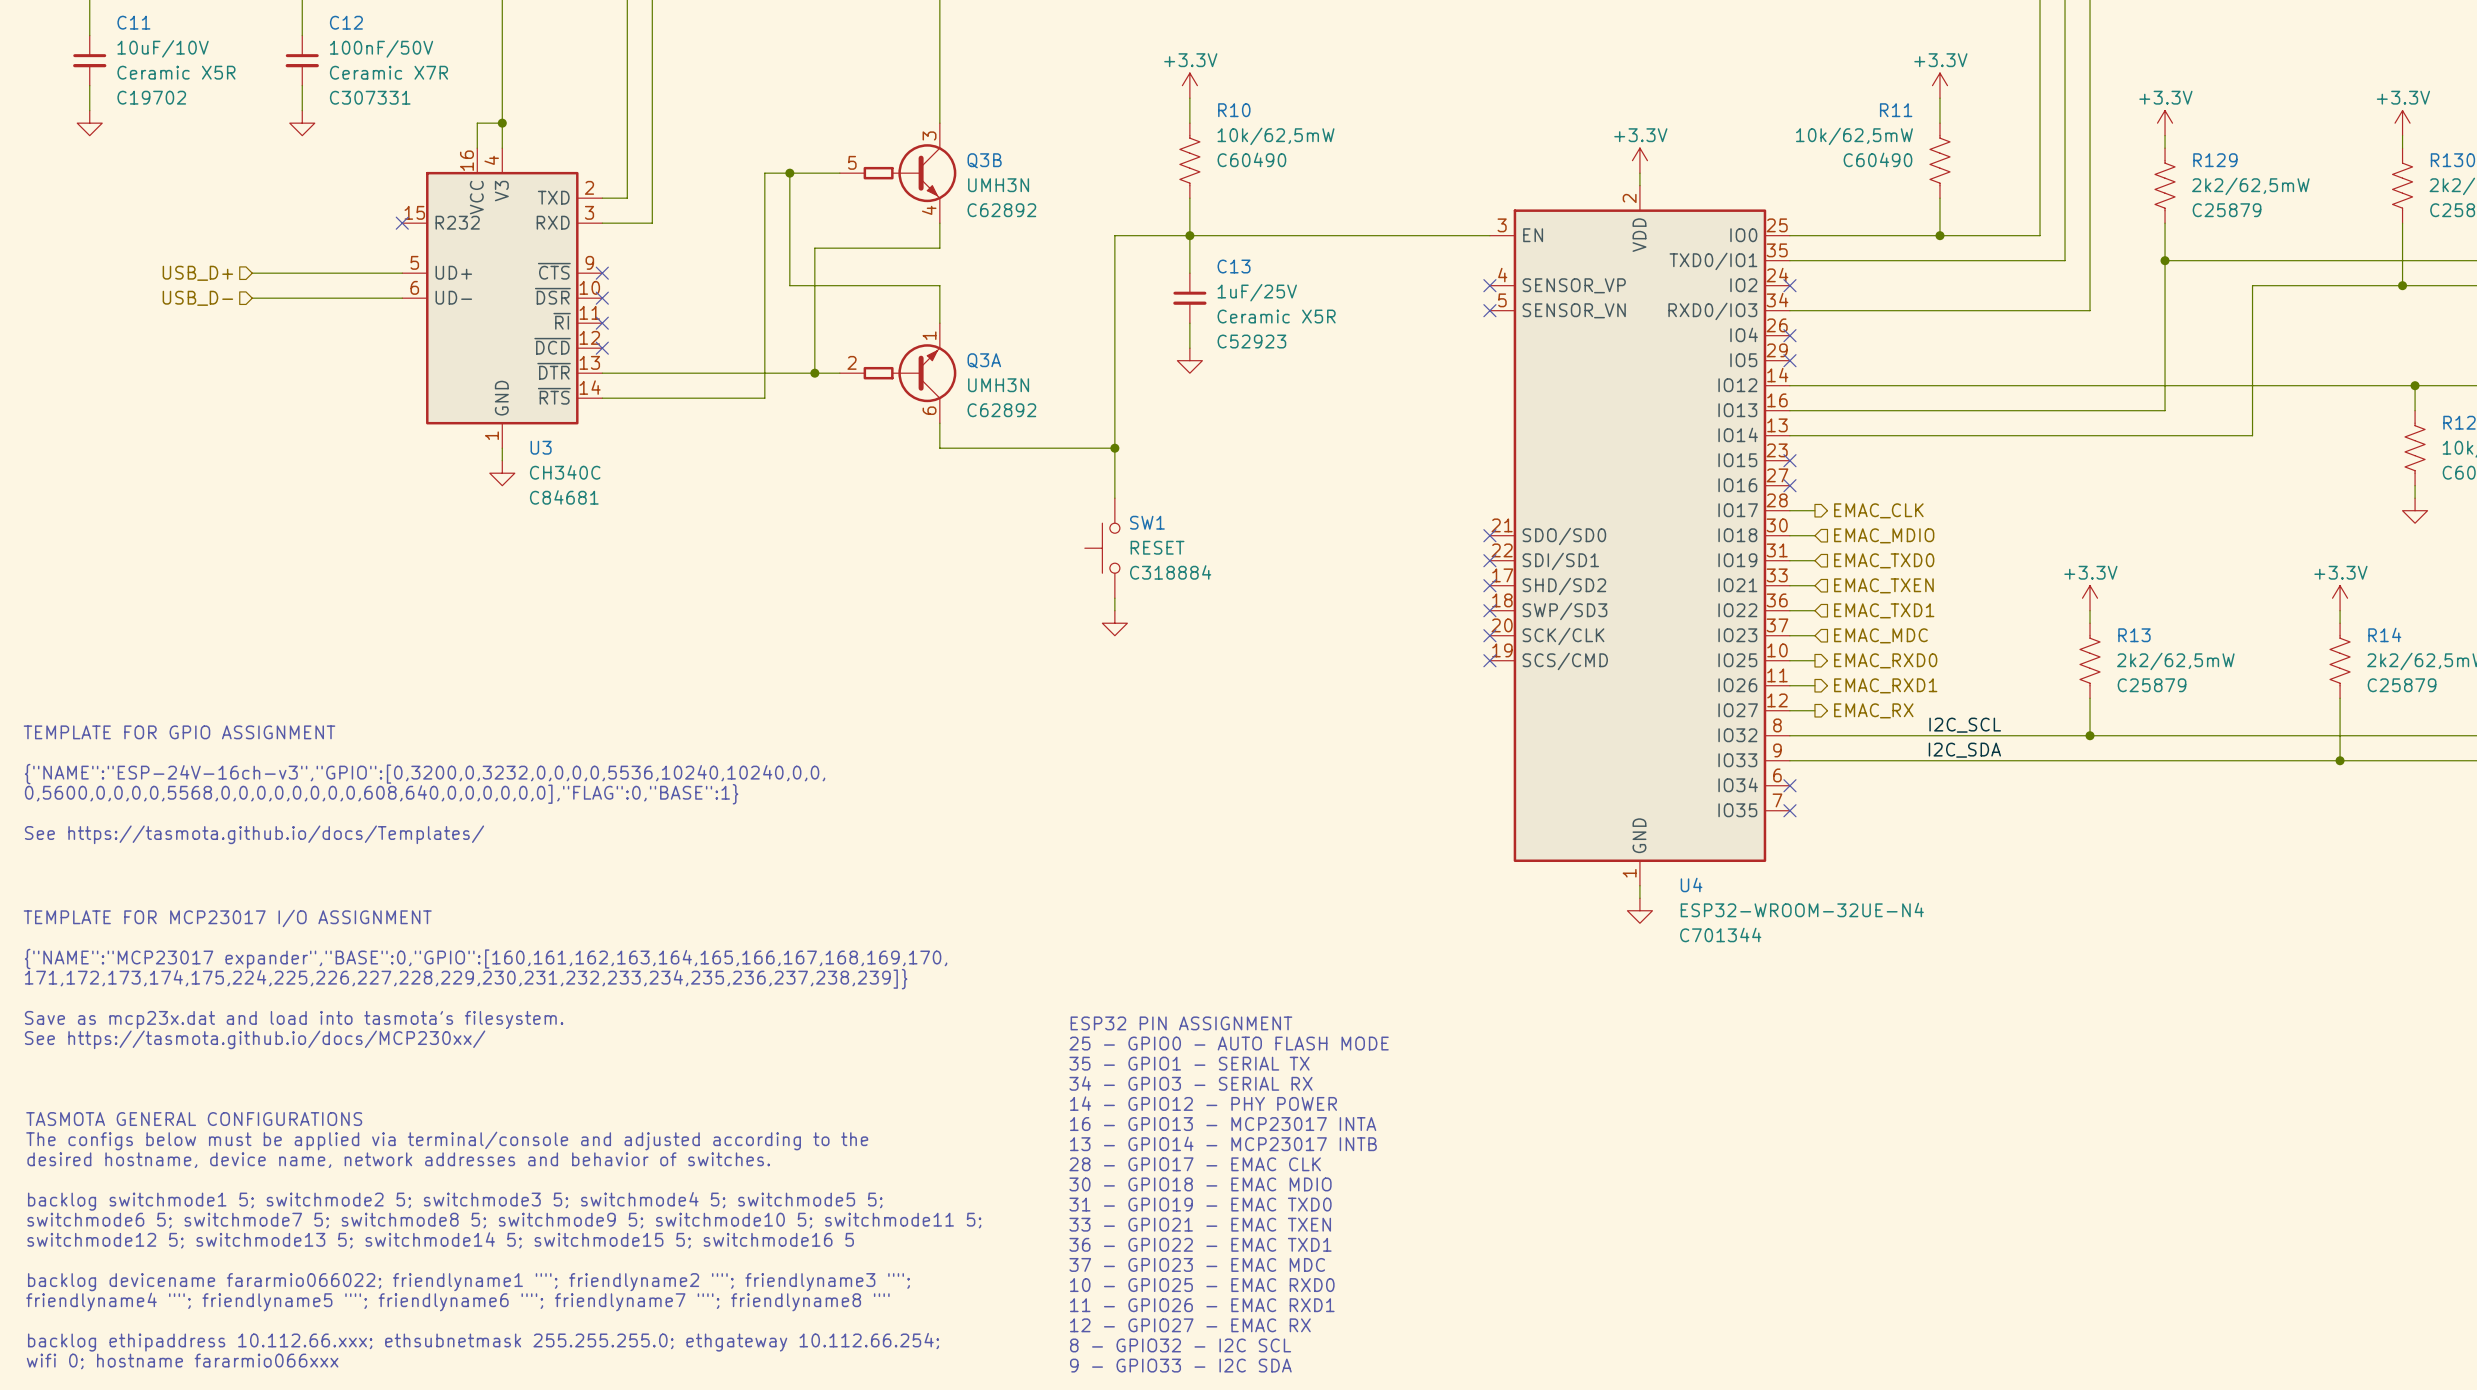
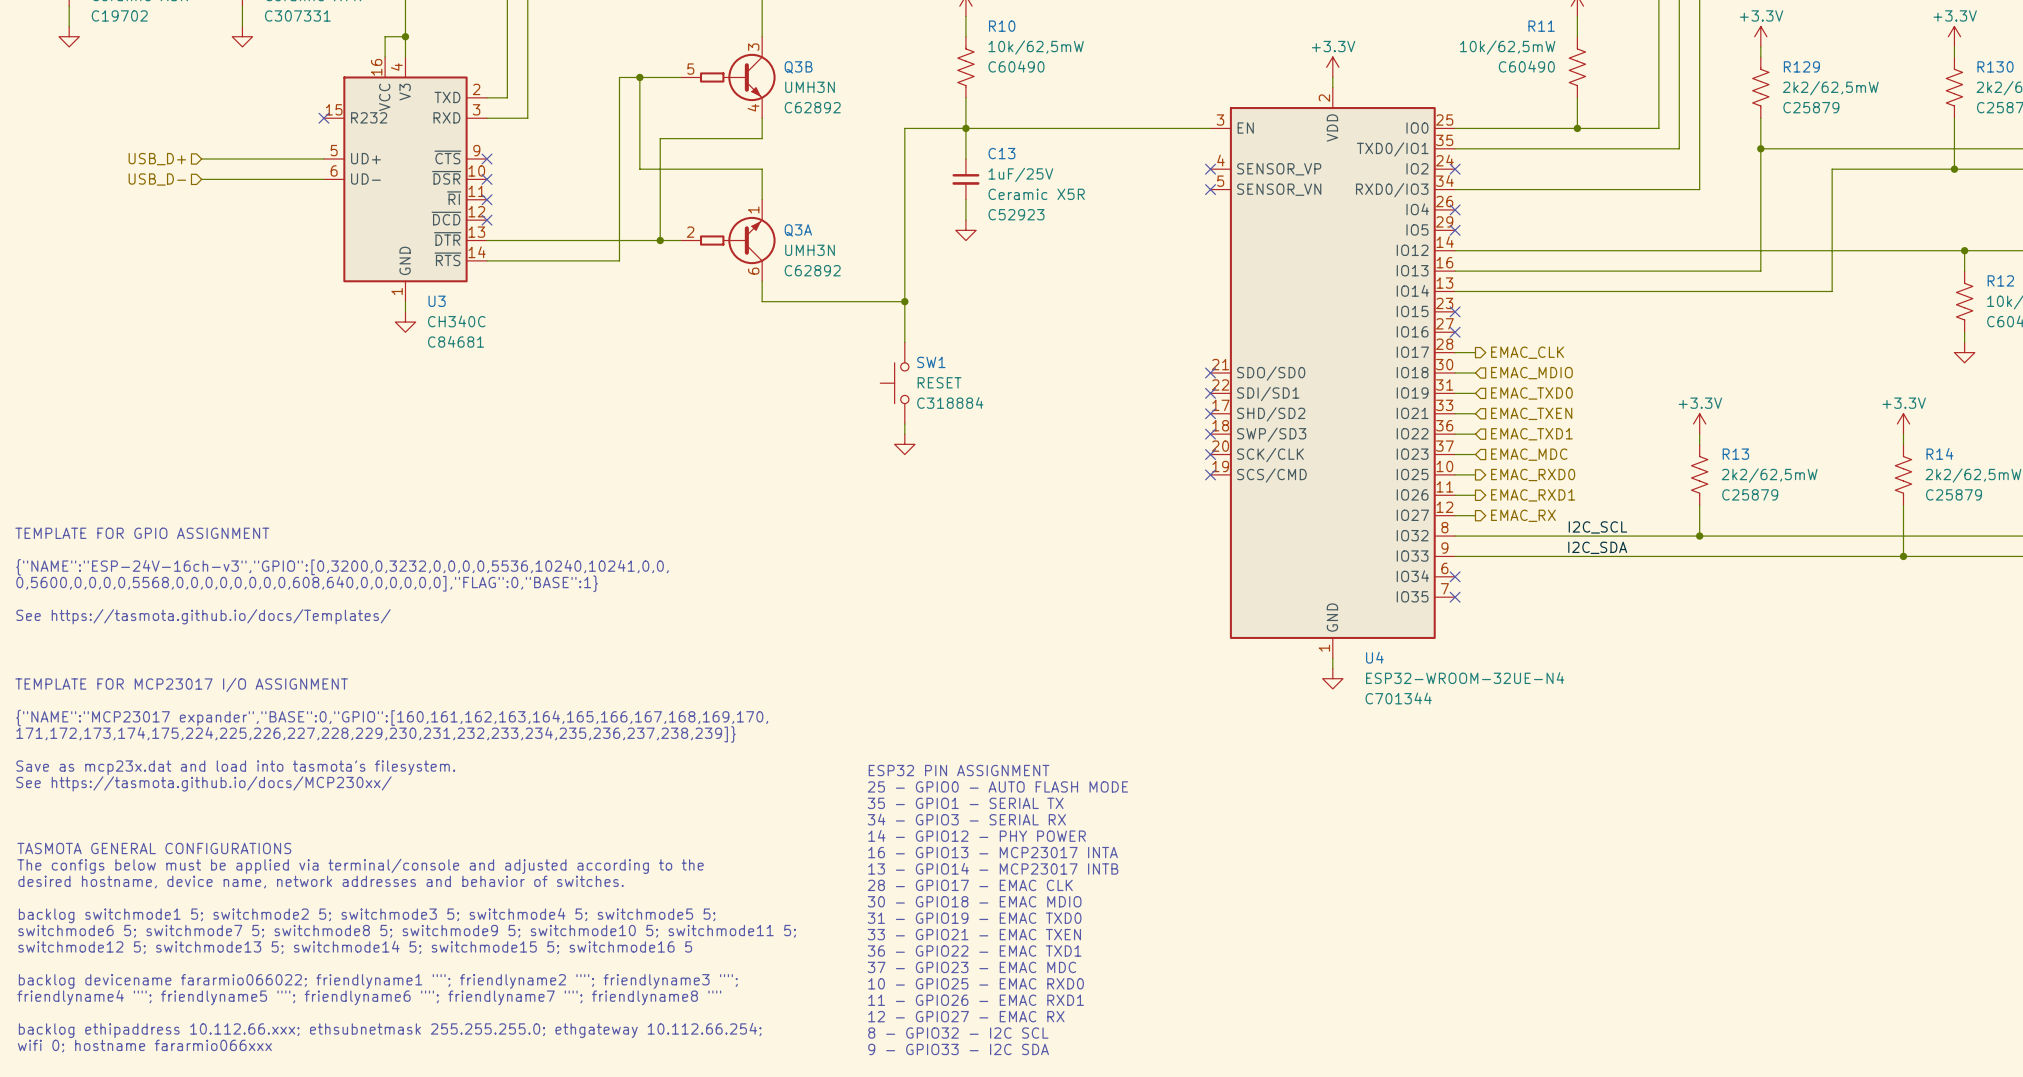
text: {"NAME":"ESP-24V-16ch-v3","GPIO":[0,3200,0,3232,0,0,0,0,5536,10240,10240,0,0, (425, 774) -> {"NAME":"ESP-24V-16ch-v3","GPIO":[0,3200,0,3232,0,0,0,0,5536,10240,10241,0,0, (342, 567)

